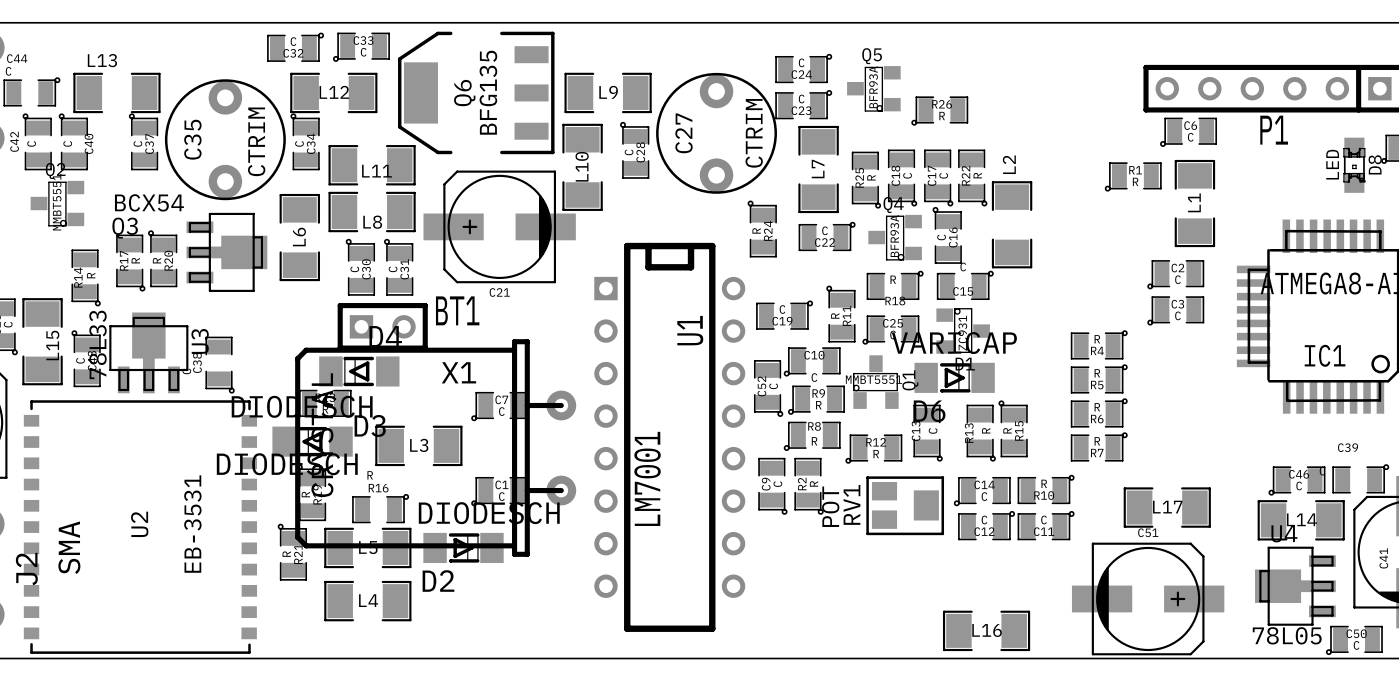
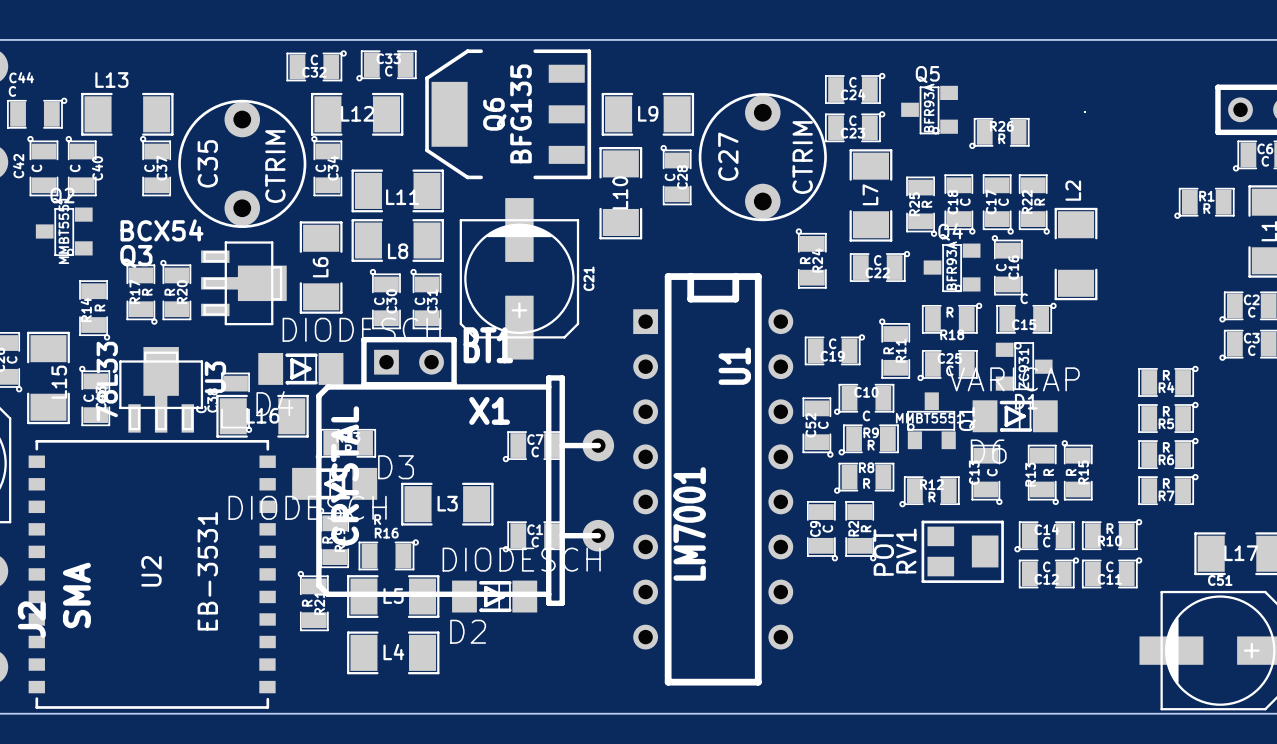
C21 rotation: 0° (499, 226) -> 90° counterclockwise (519, 278)
D4 rotation: 0° (359, 371) -> 180° (300, 368)
D4 position: (359, 371) -> (300, 368)
L3 position: (418, 445) -> (447, 504)
R16 position: (380, 508) -> (388, 554)
L16 position: (986, 630) -> (262, 416)

